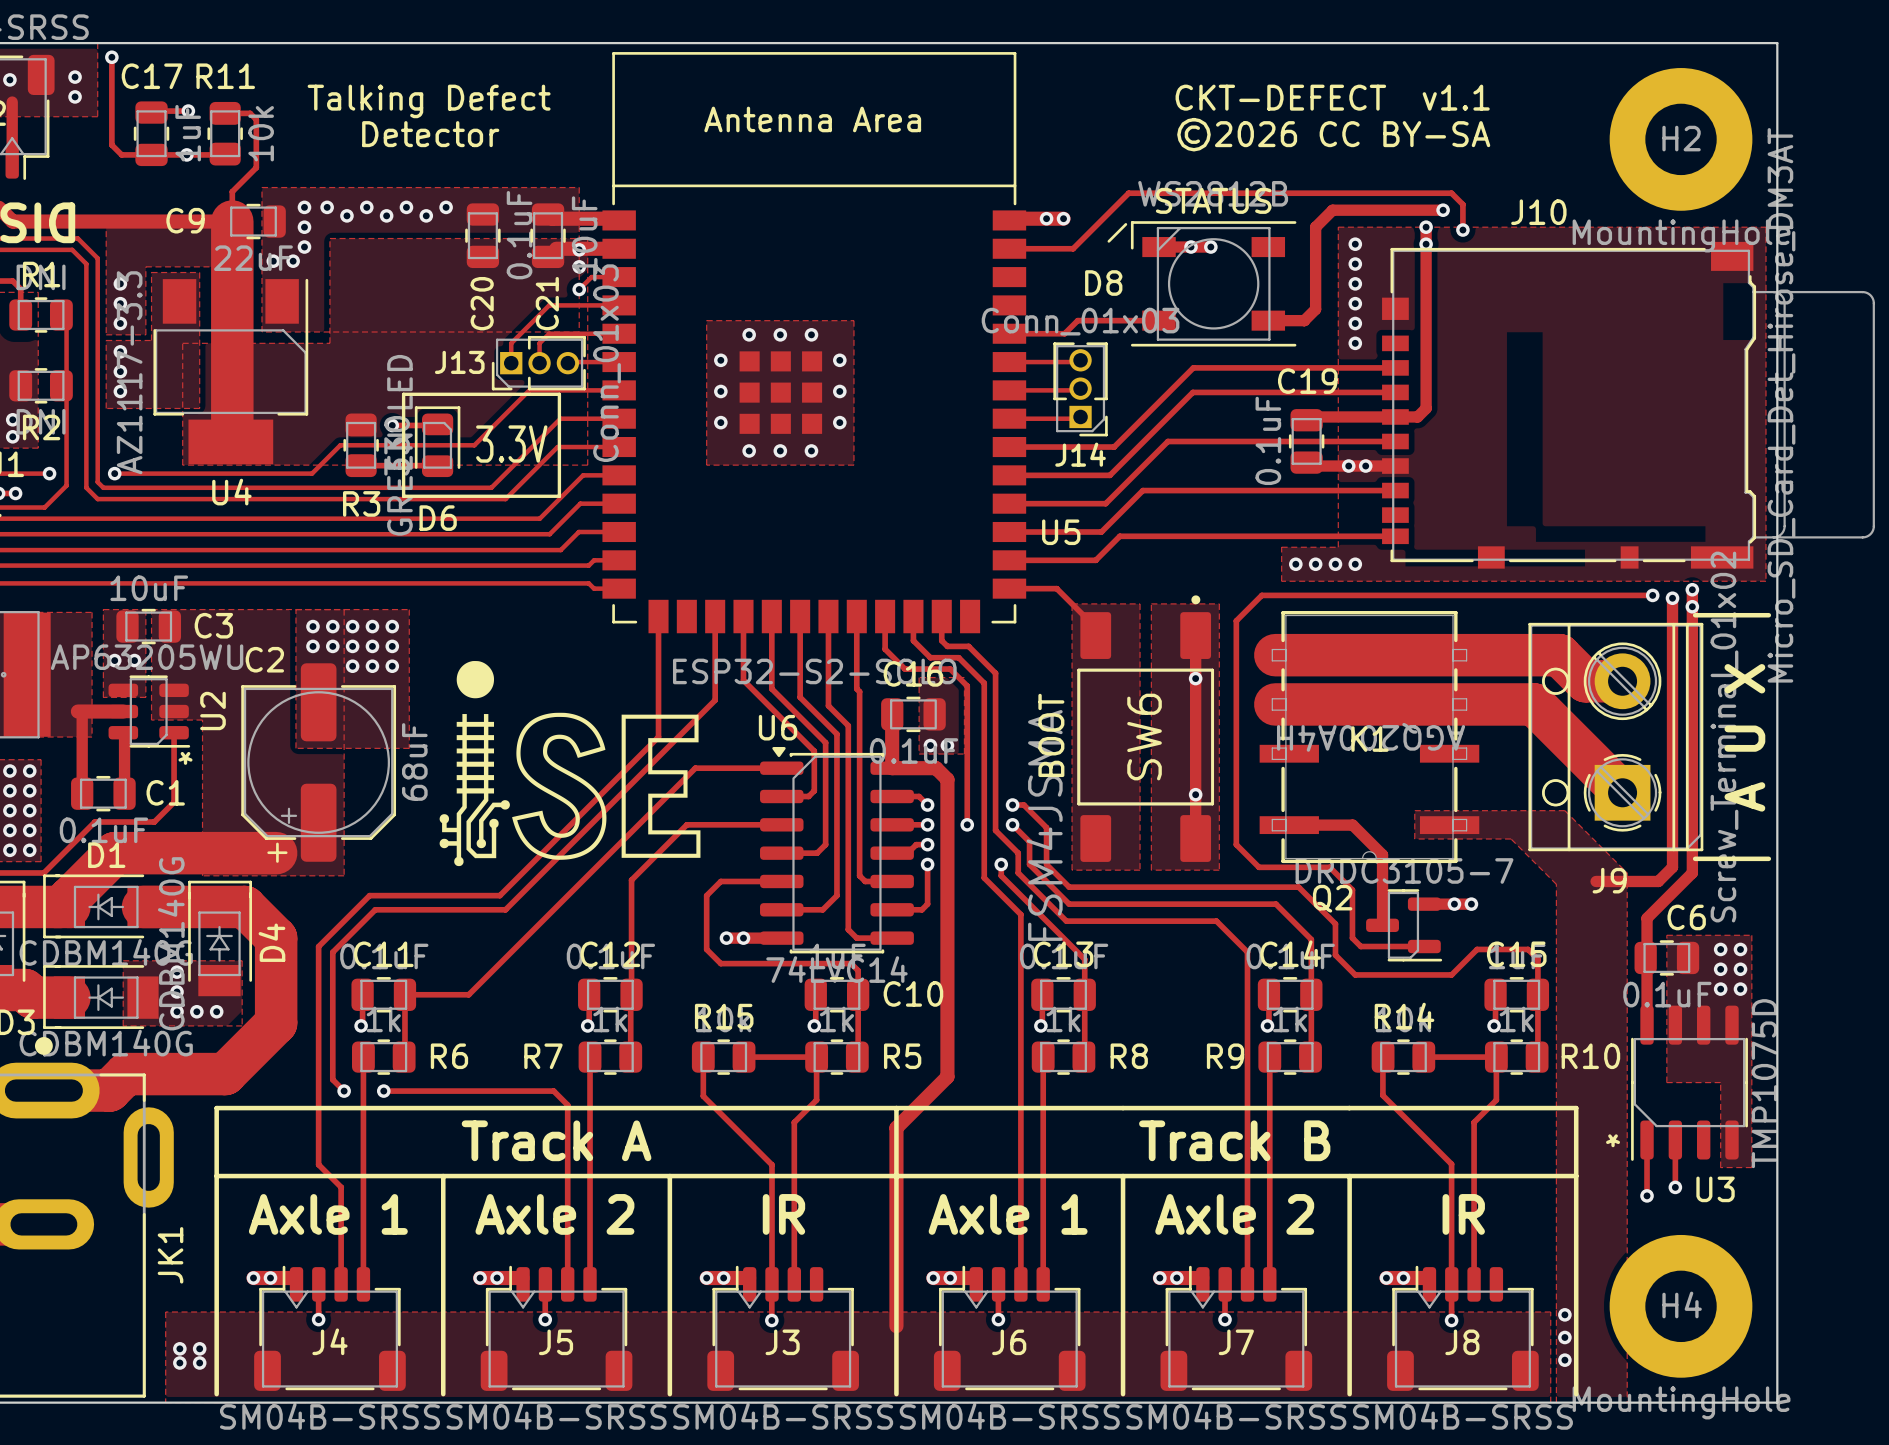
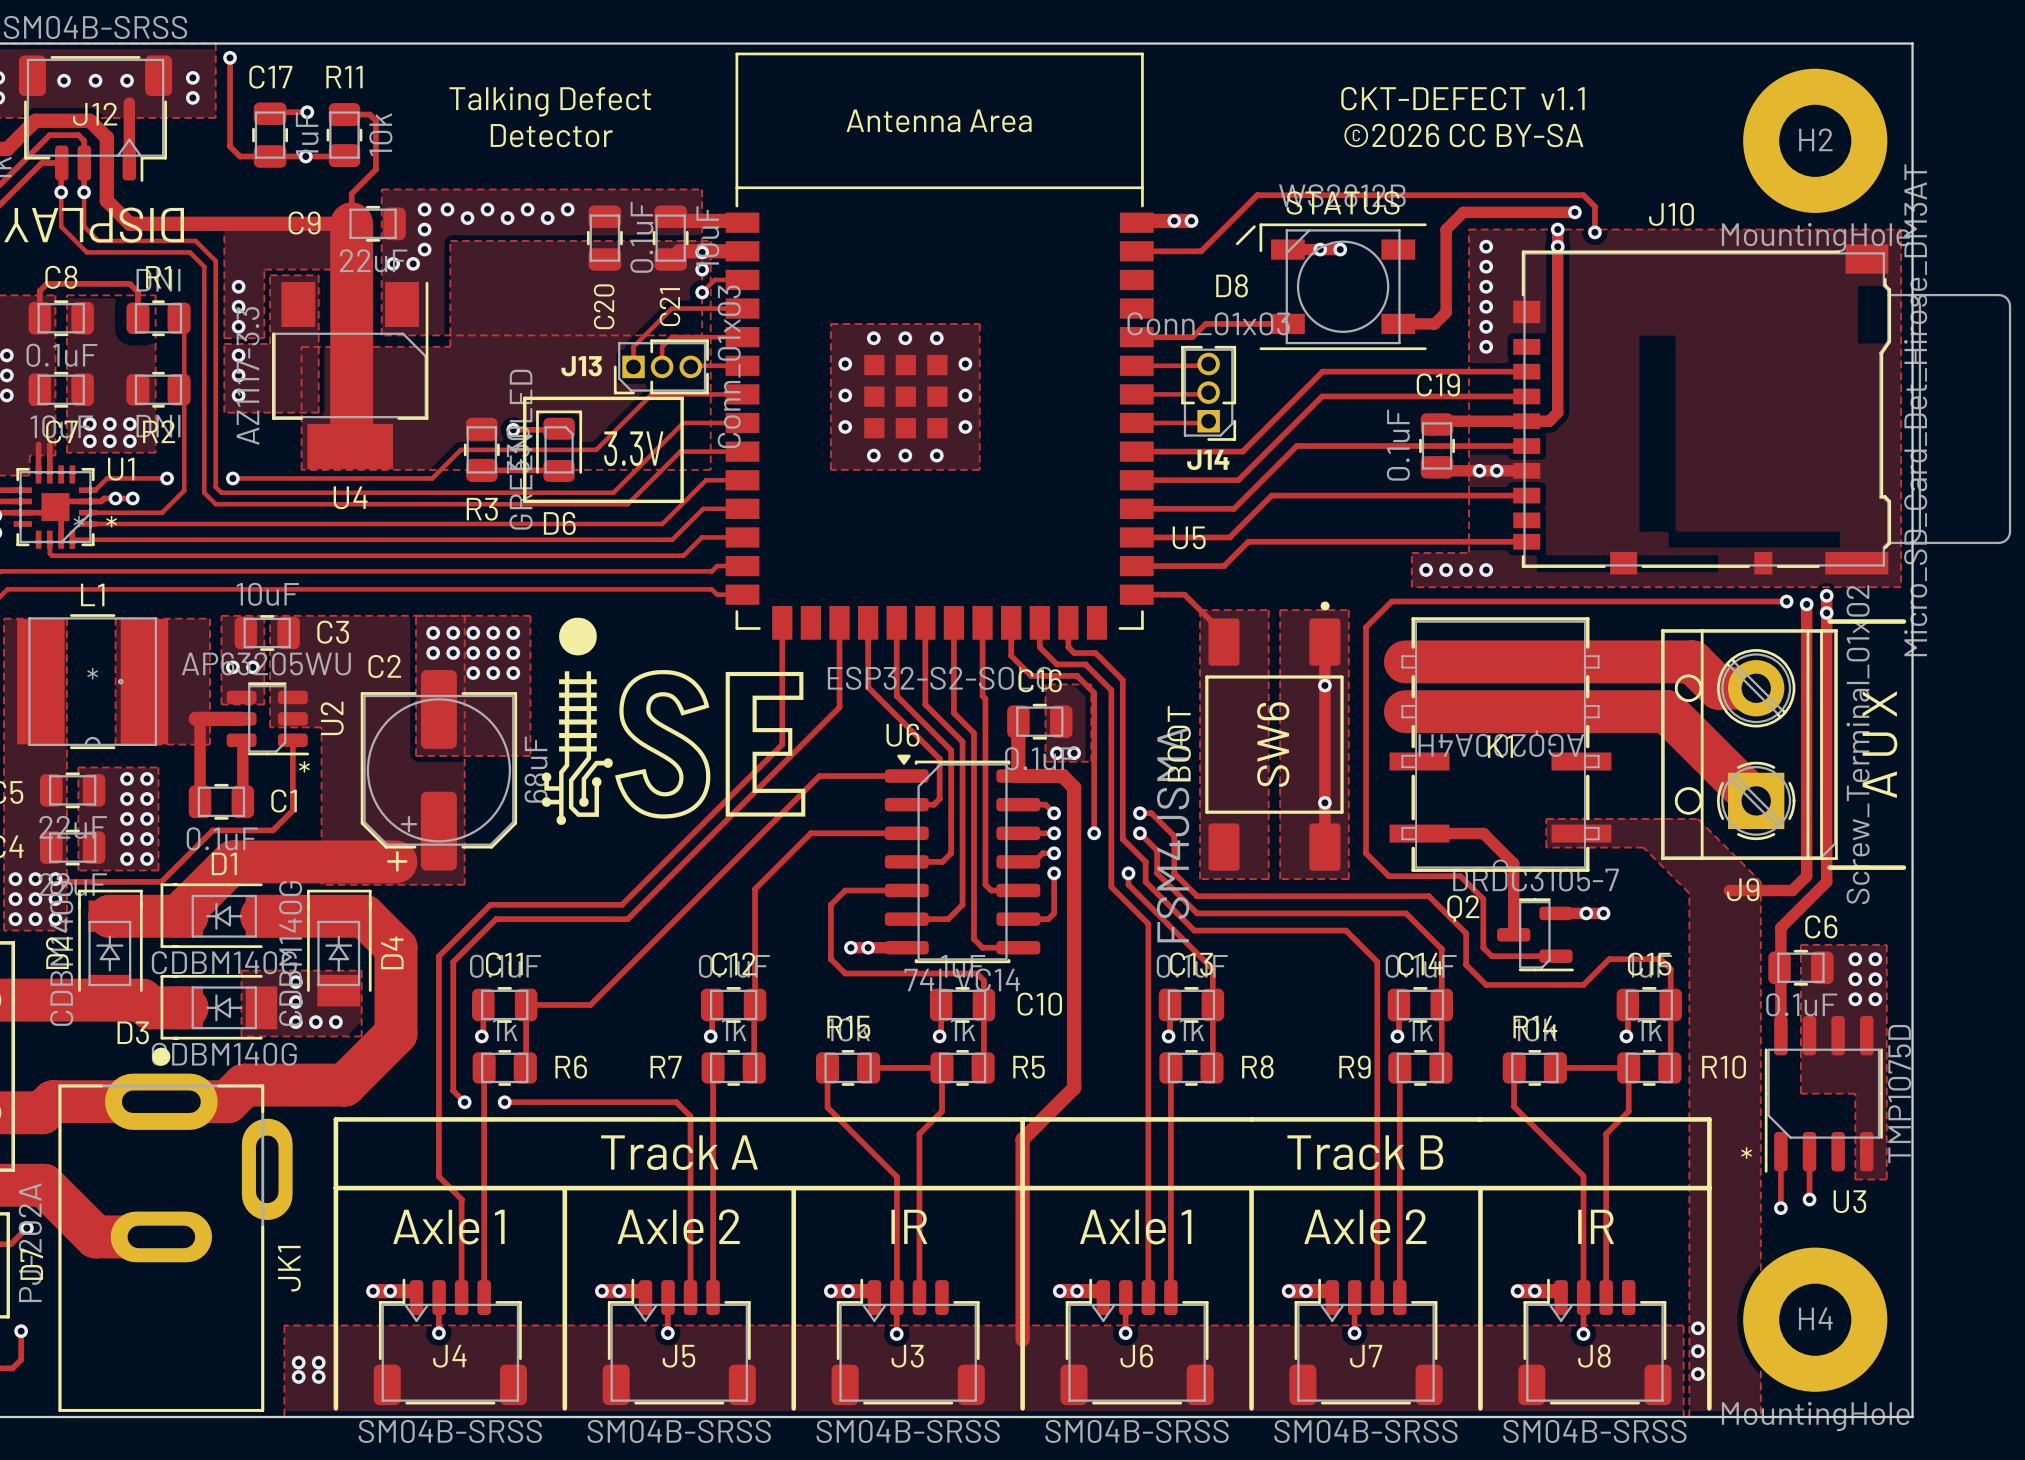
drawing position: (475, 679) -> (577, 636)
drawing position: (559, 786) -> (662, 744)
drawing position: (661, 786) -> (765, 744)
drawing position: (469, 790) -> (571, 748)
drawing position: (493, 824) -> (596, 782)

